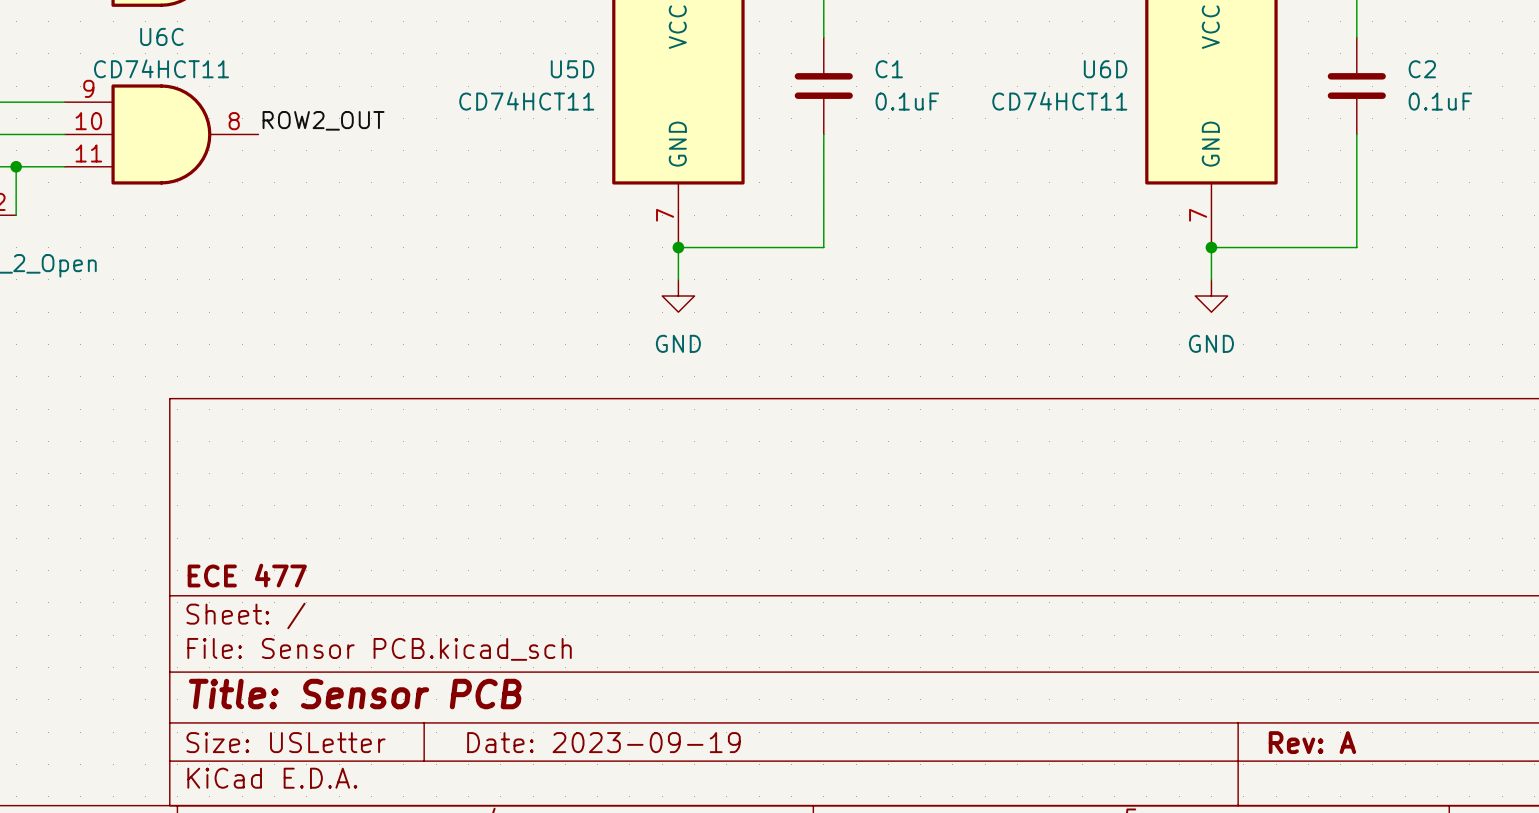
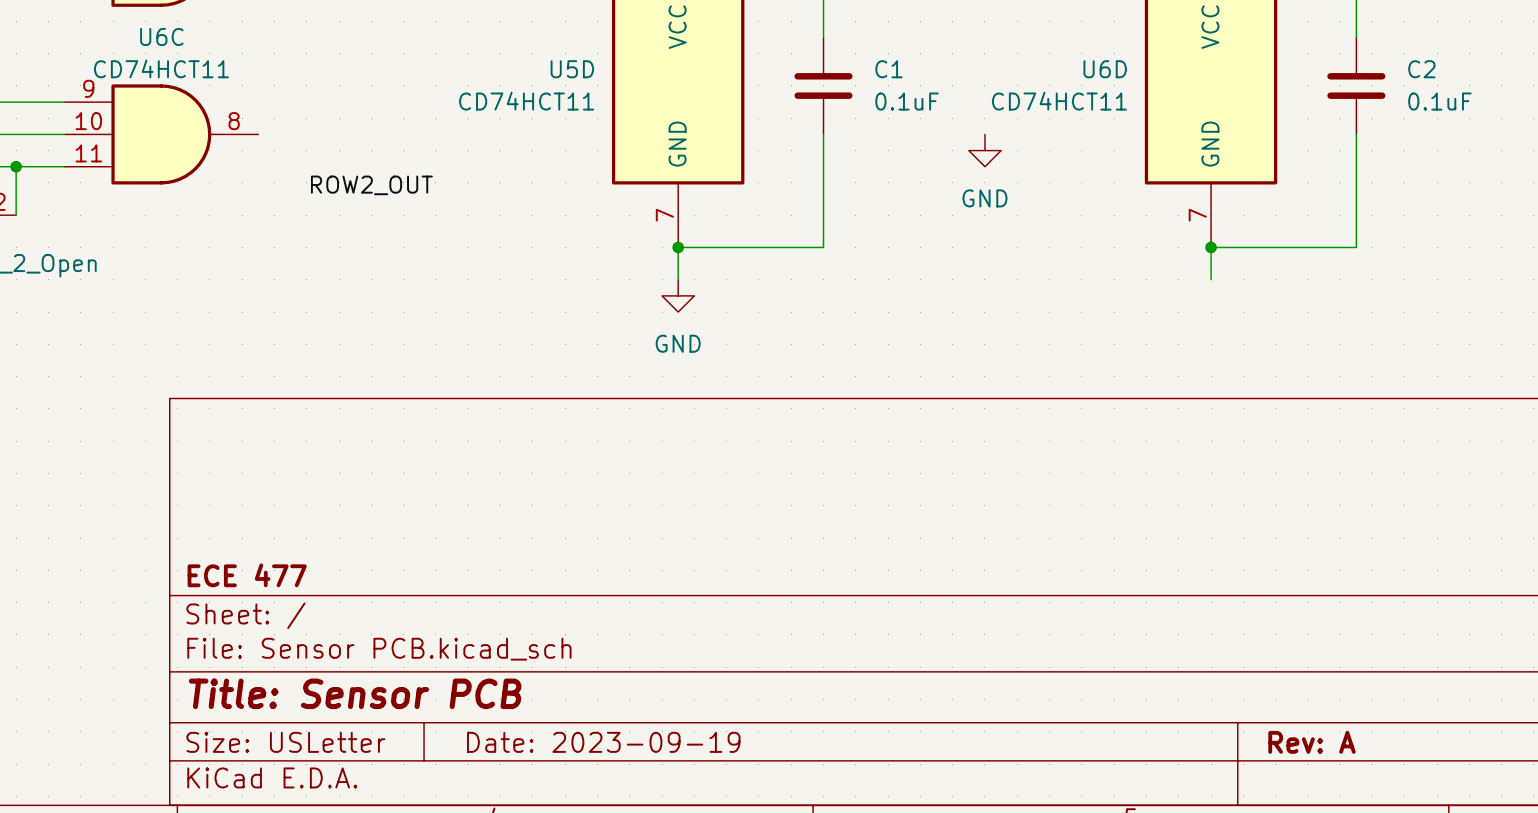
label position: ROW2_OUT (323, 120) -> ROW2_OUT (371, 185)
power symbol: none -> GND (984, 150)
power symbol: GND (1211, 296) -> none

